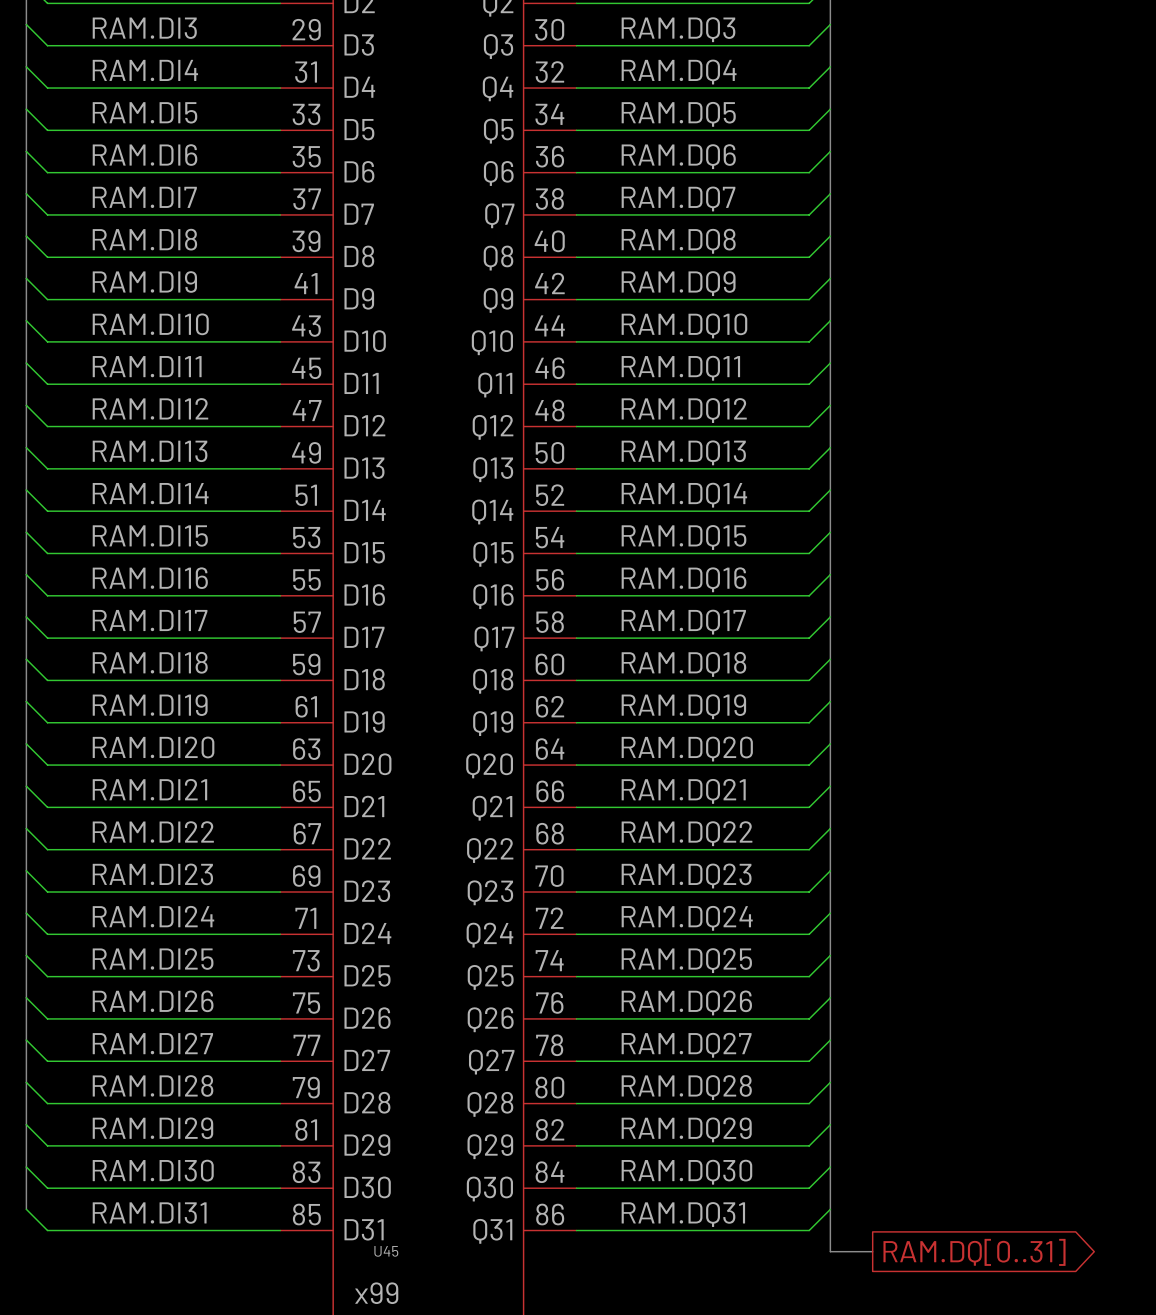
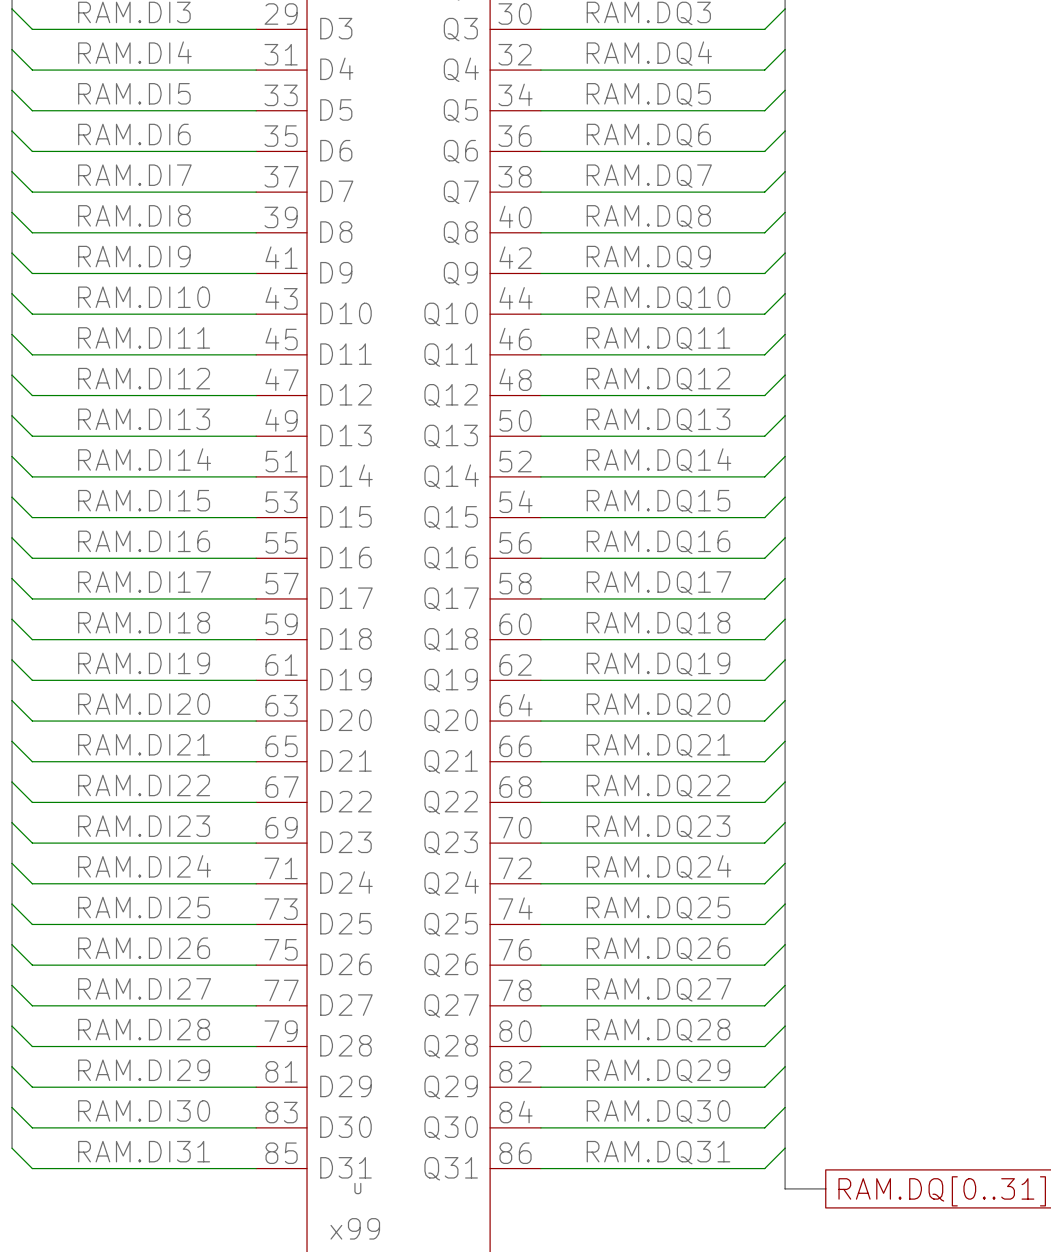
U45 name: U45 (386, 1251) -> U (357, 1188)

